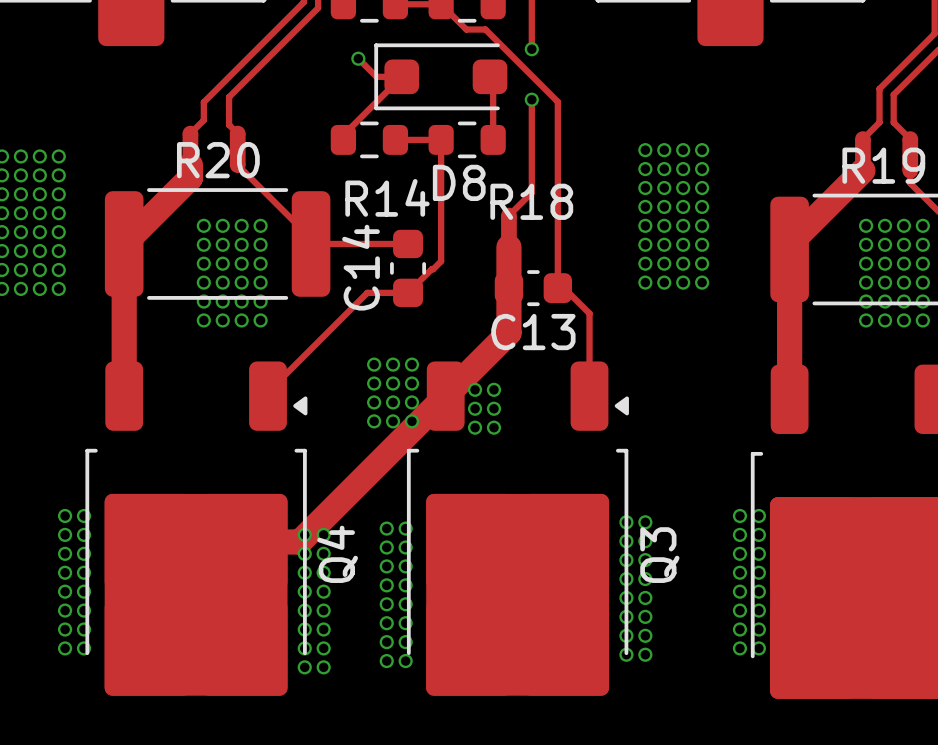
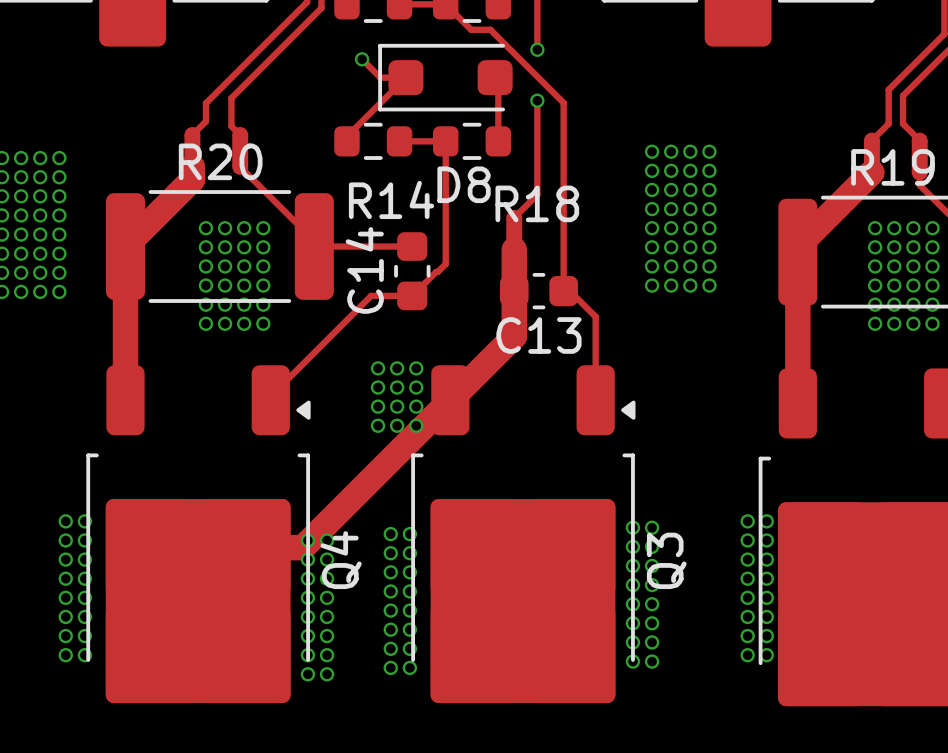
via: (475, 389) -> none
via: (493, 389) -> none
via: (475, 408) -> none
via: (493, 408) -> none
via: (475, 427) -> none
via: (493, 427) -> none

